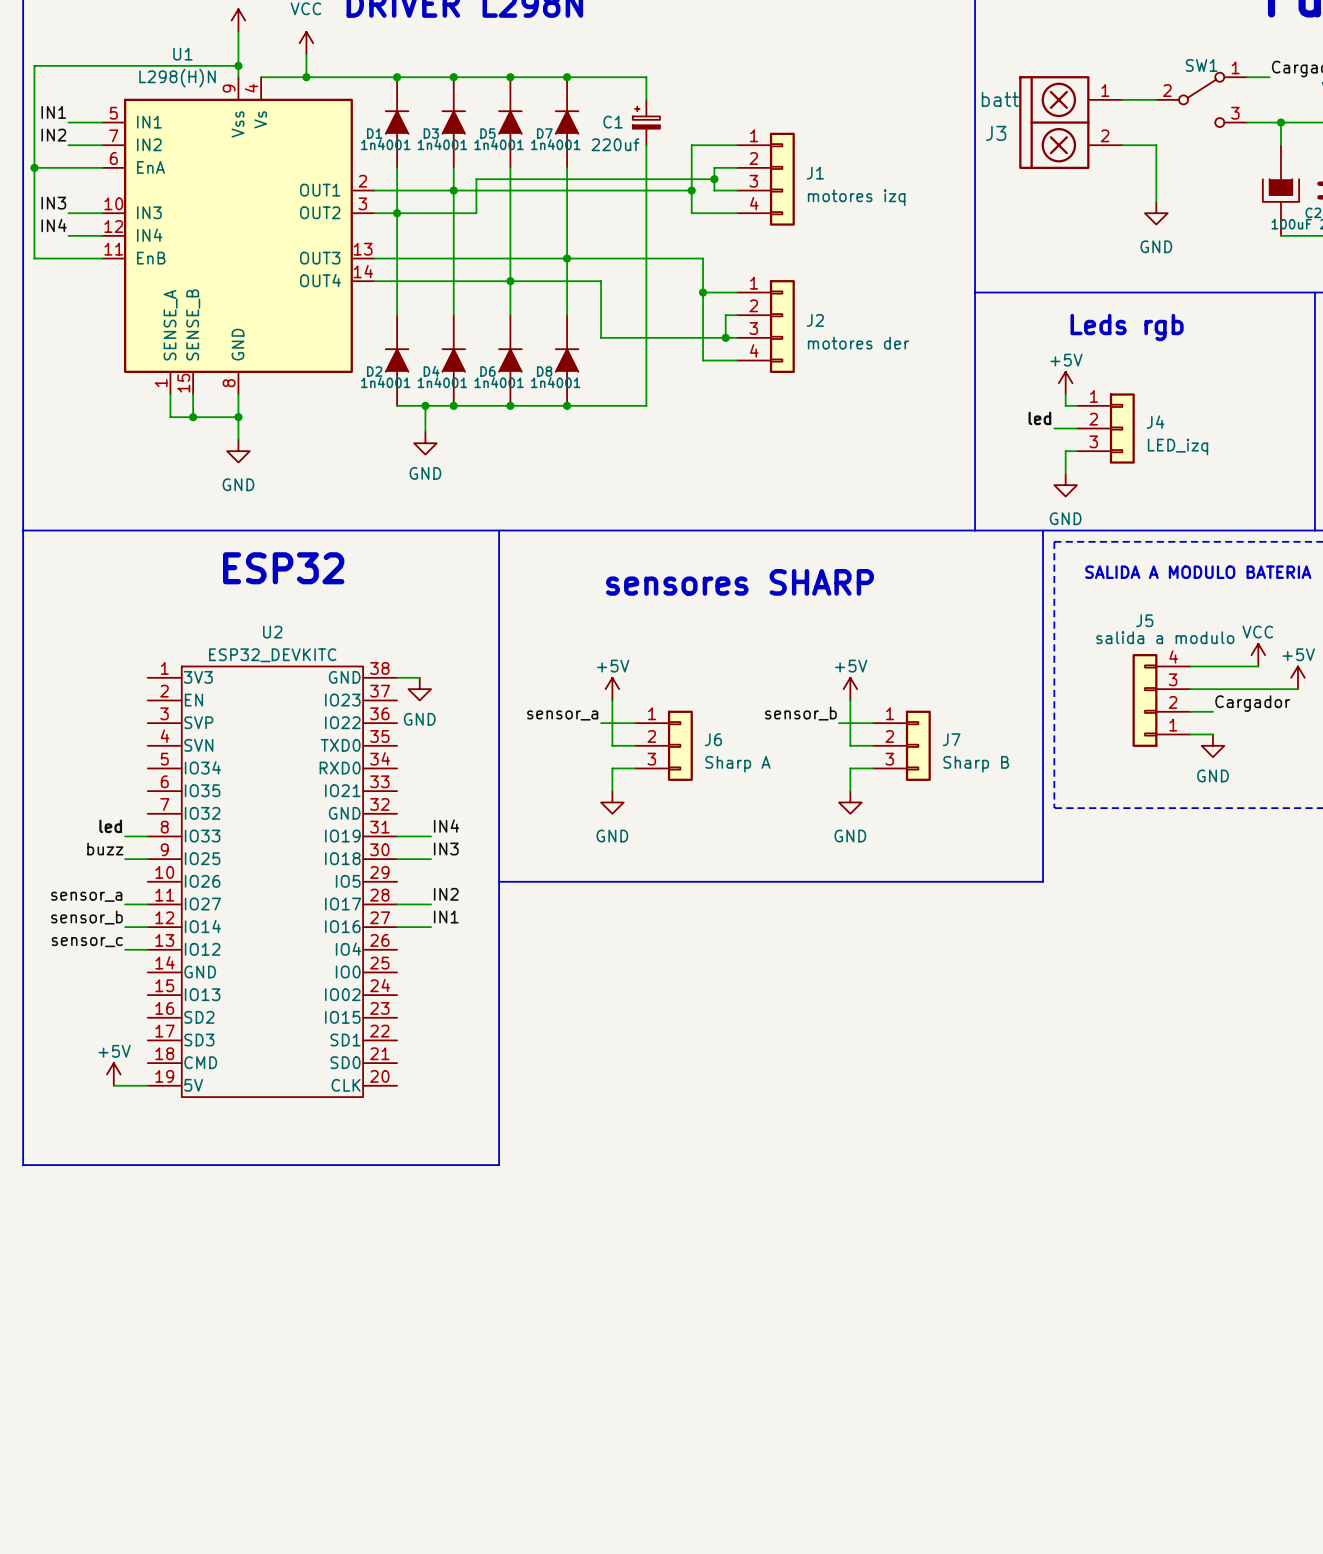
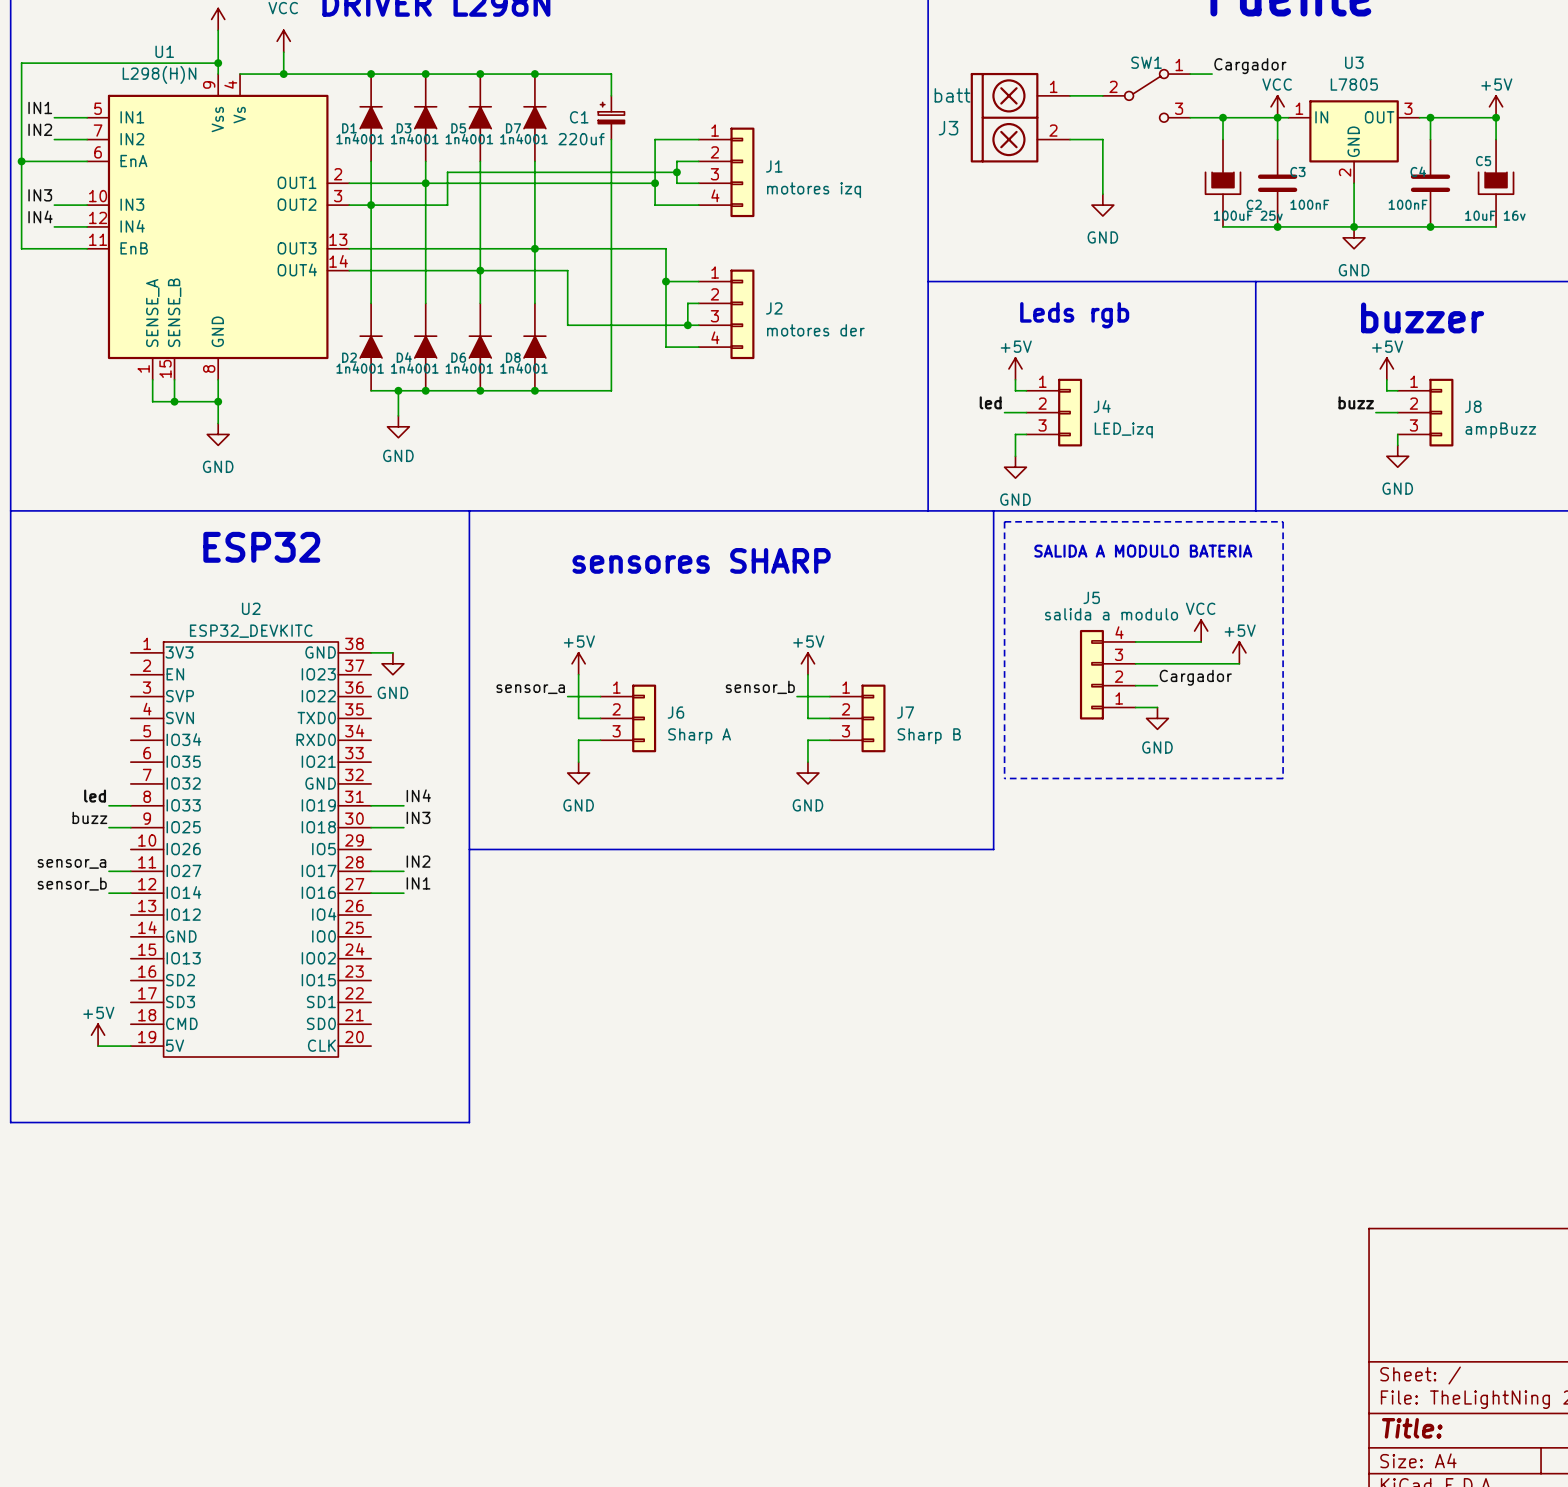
label: sensor_c (87, 942) -> none
wire: (125, 949) (147, 949) -> none

